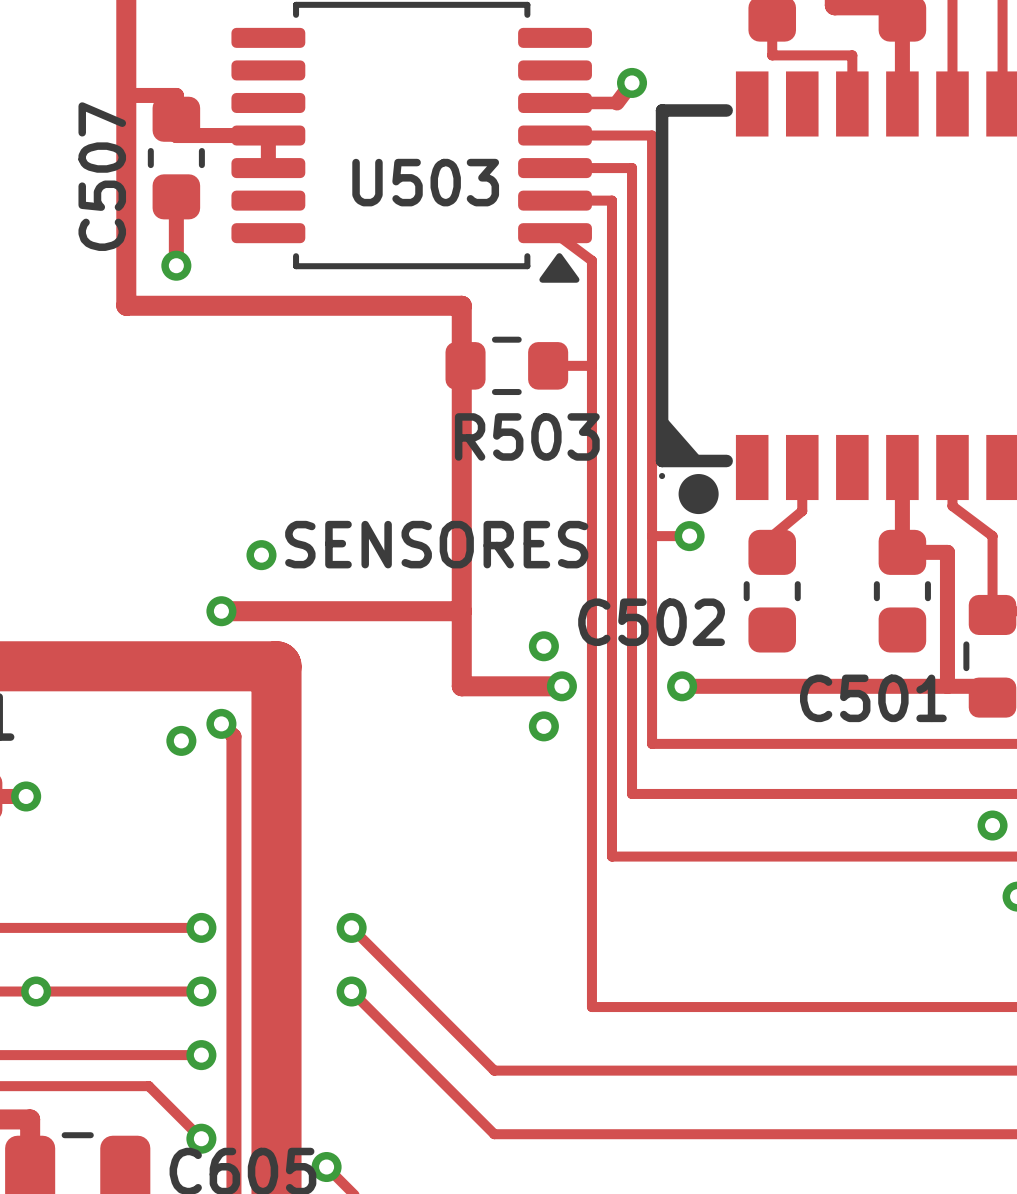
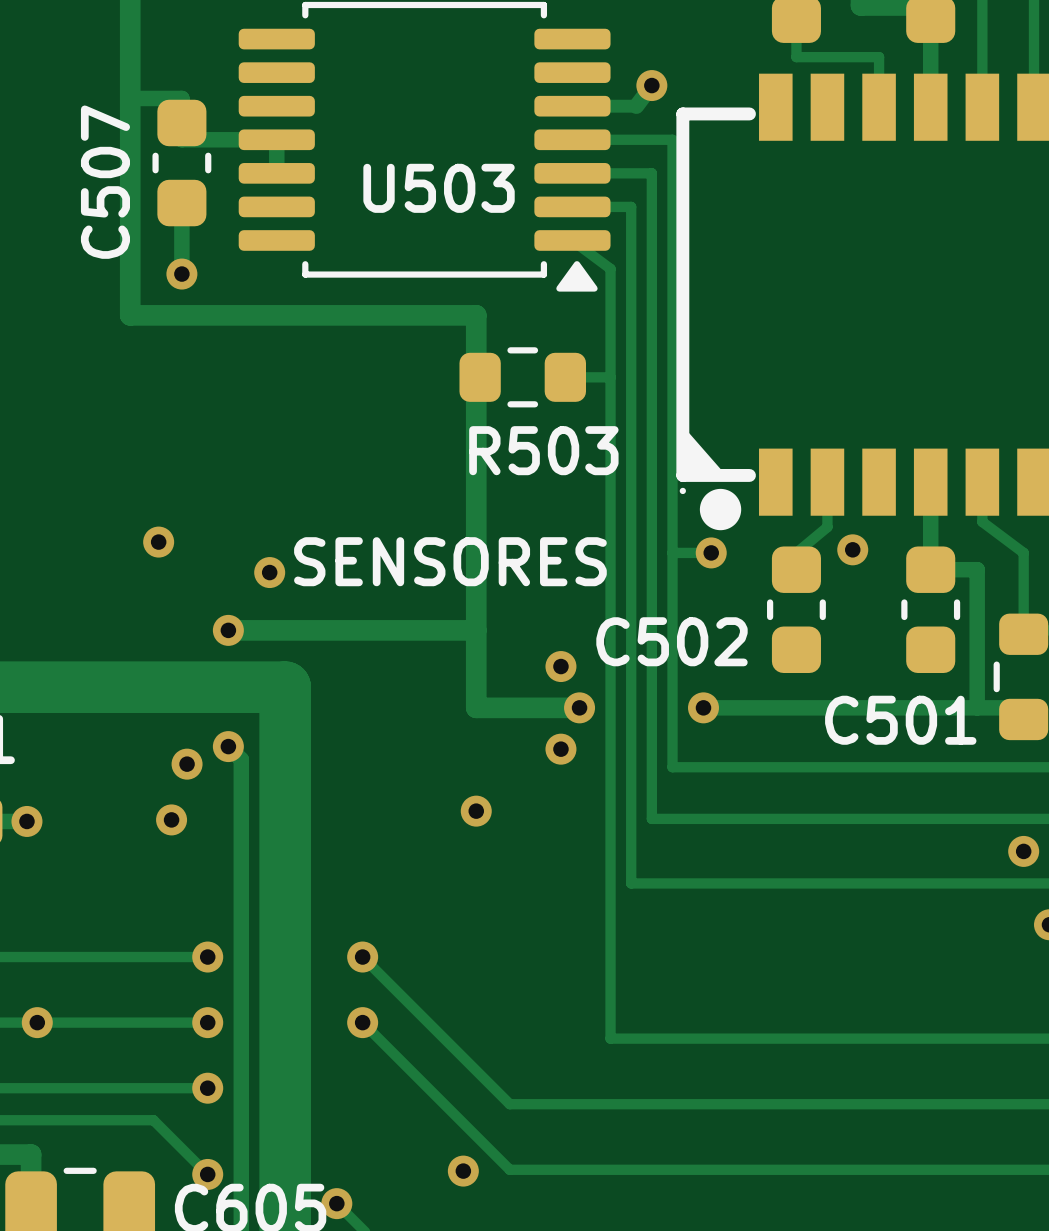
via: none -> (158, 542)
via: none -> (852, 549)
via: none -> (476, 811)
via: none -> (171, 819)
via: none -> (463, 1171)

